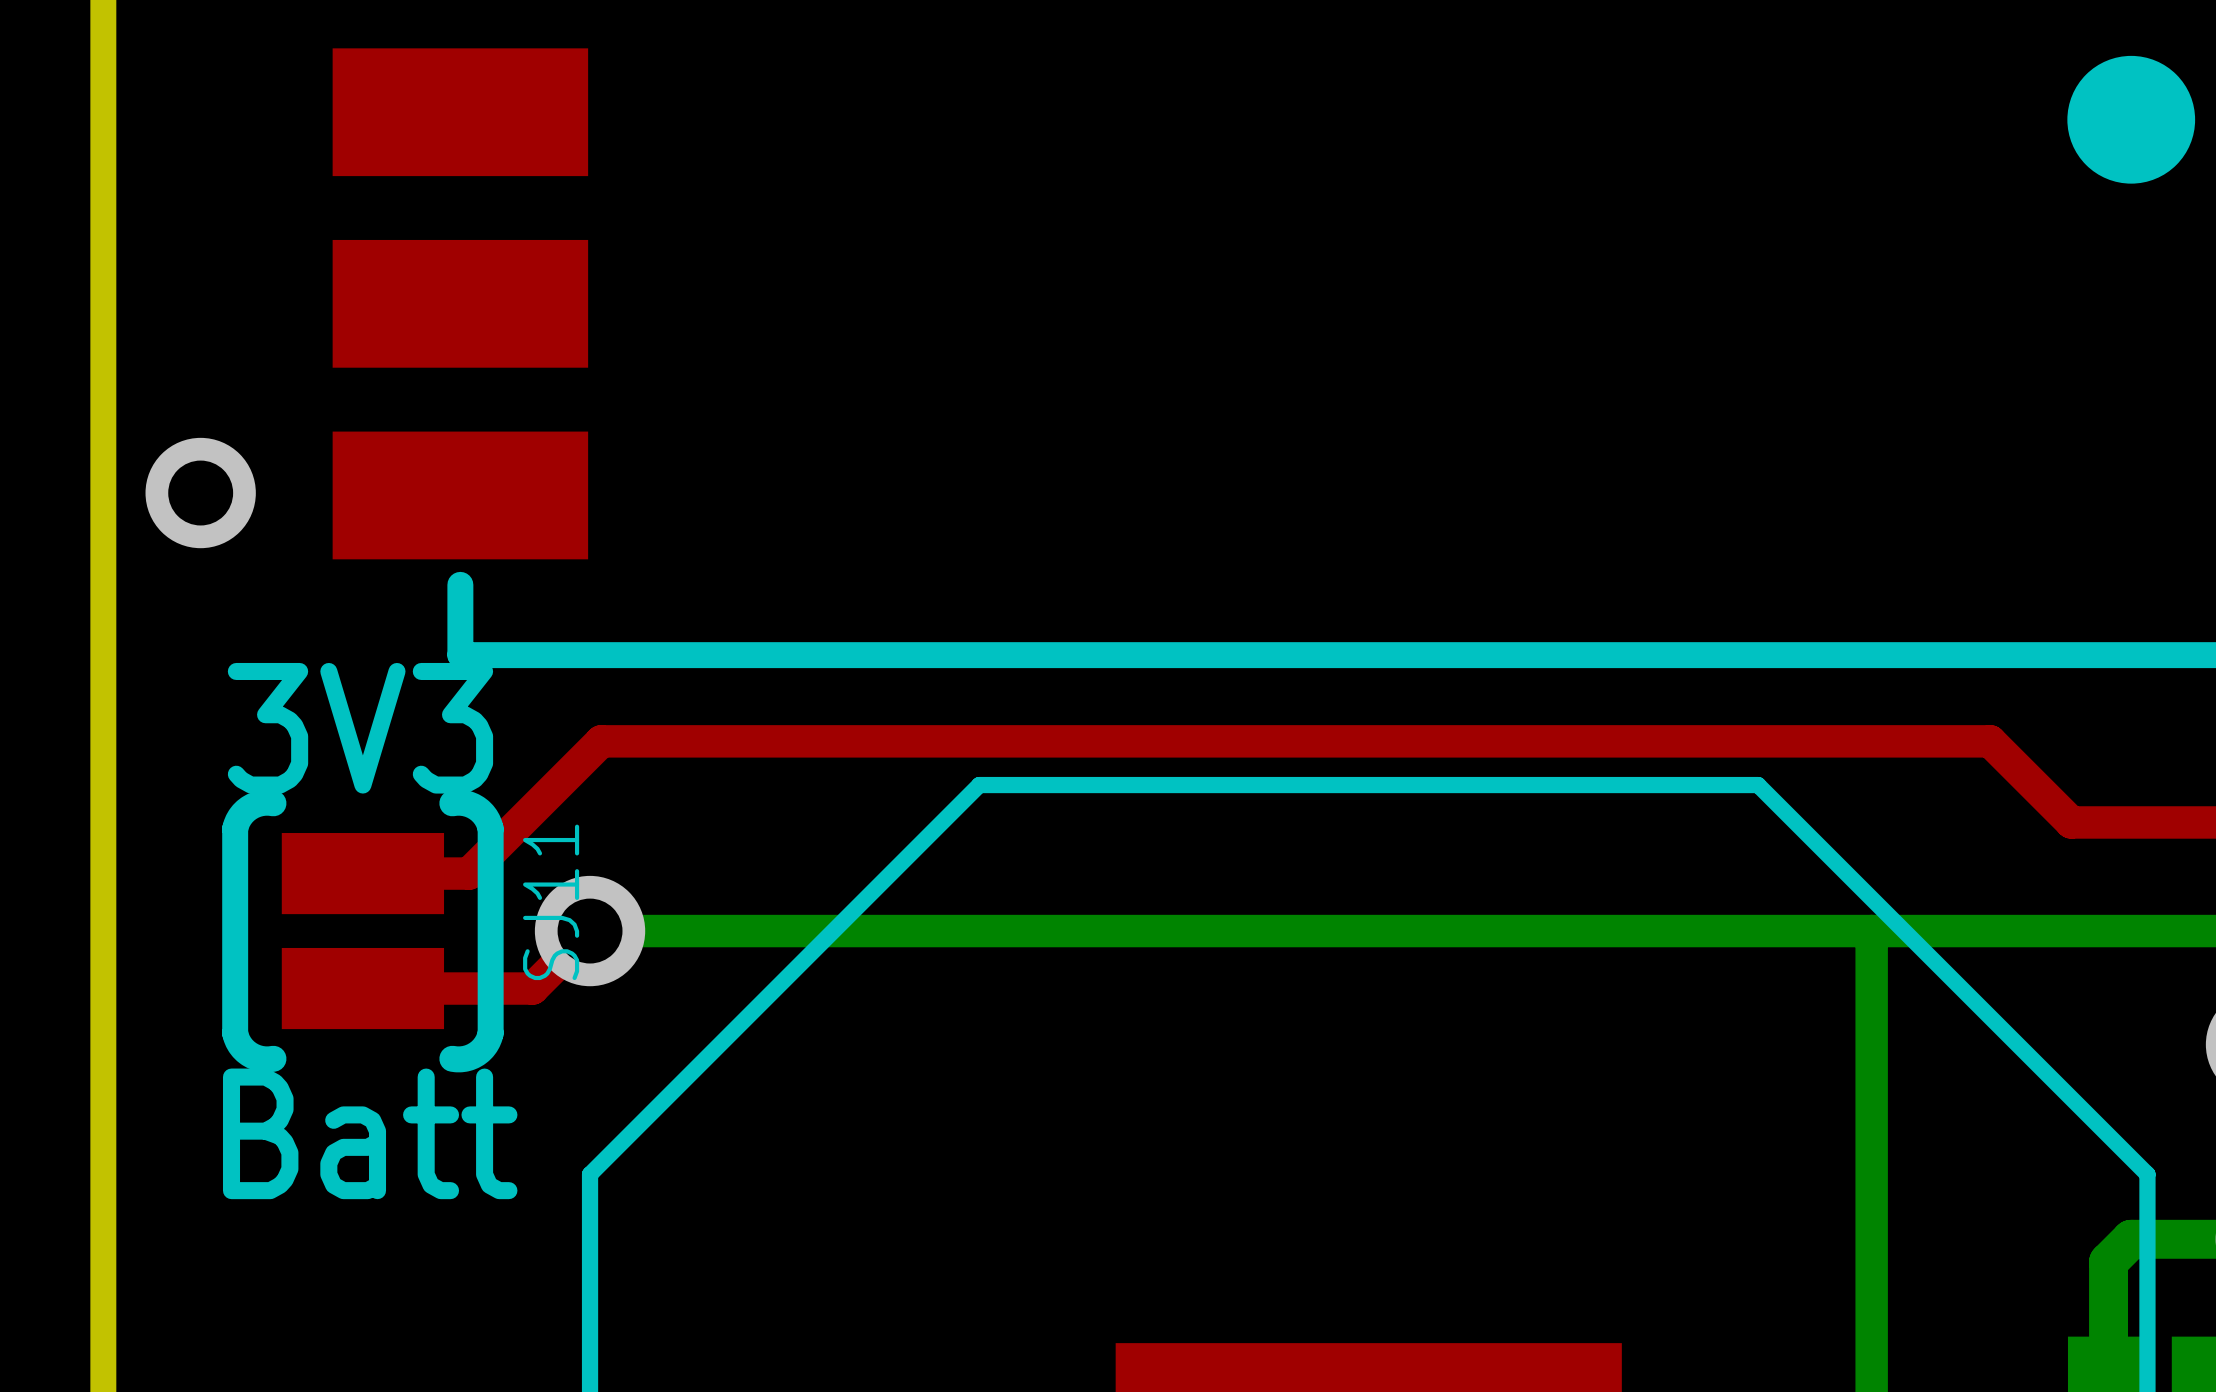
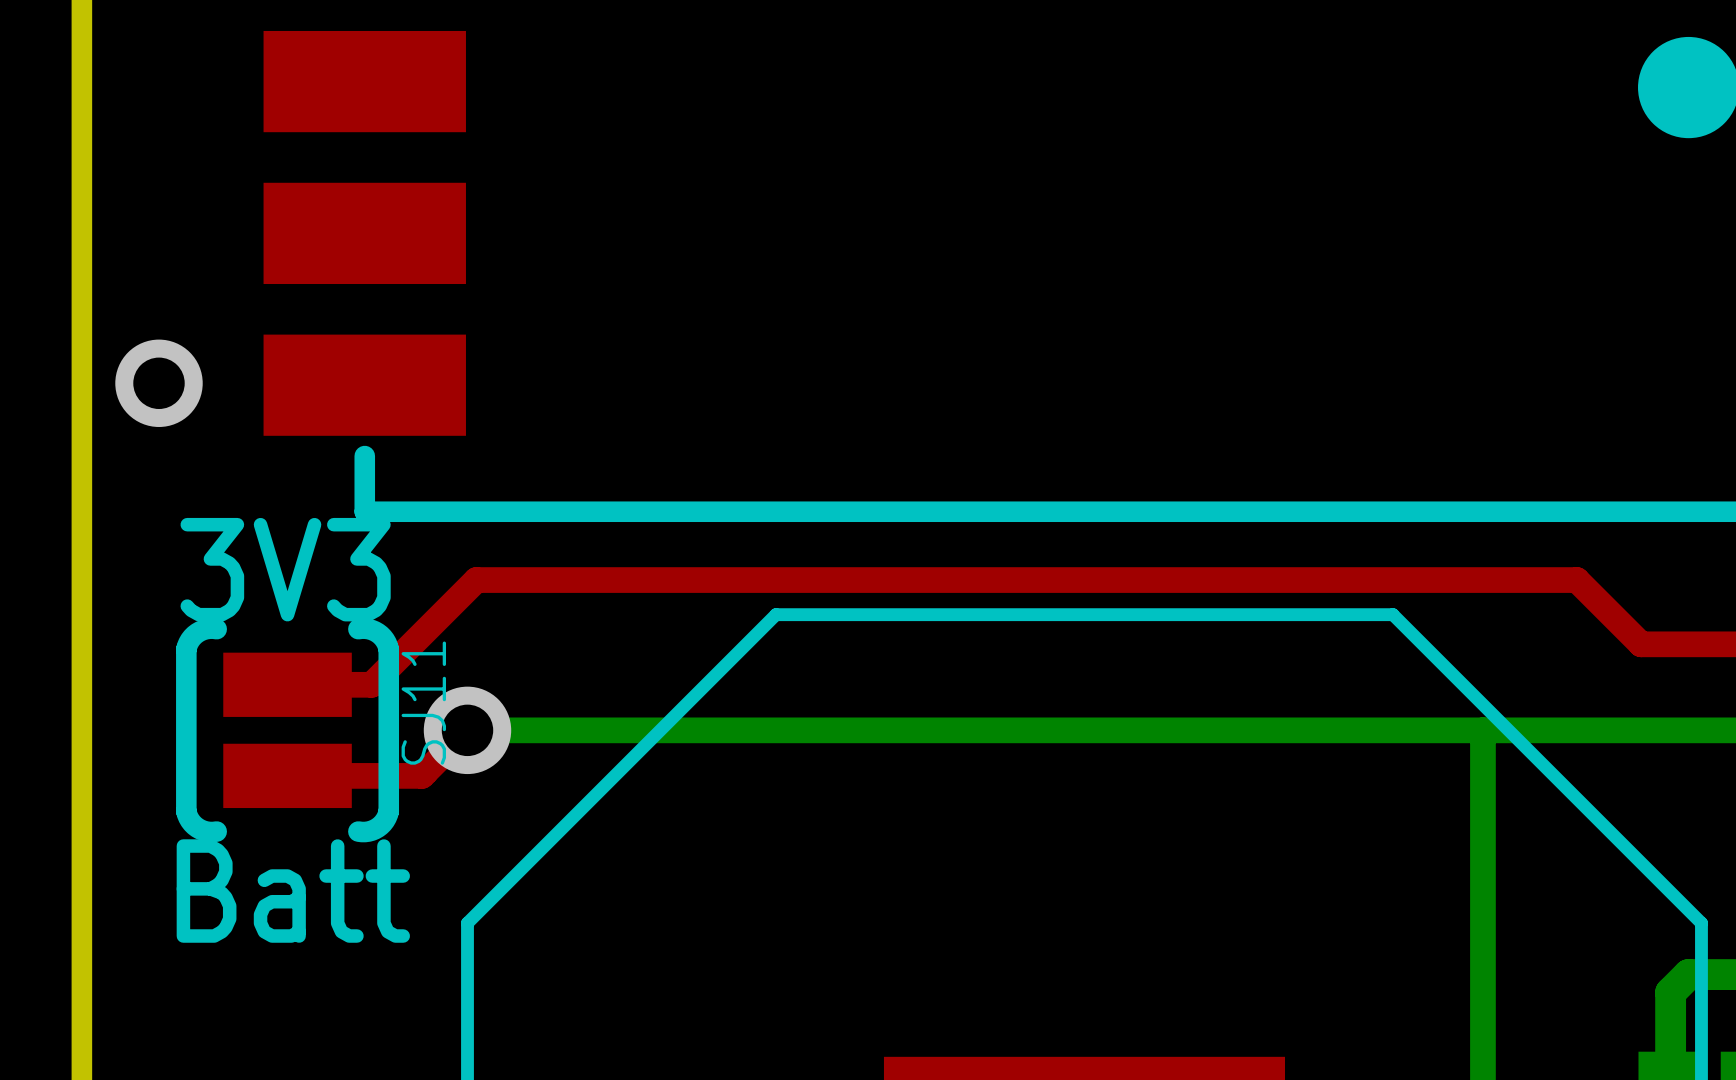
SJ11 name position: SJ11 (551, 902) -> SJ11 (423, 703)

